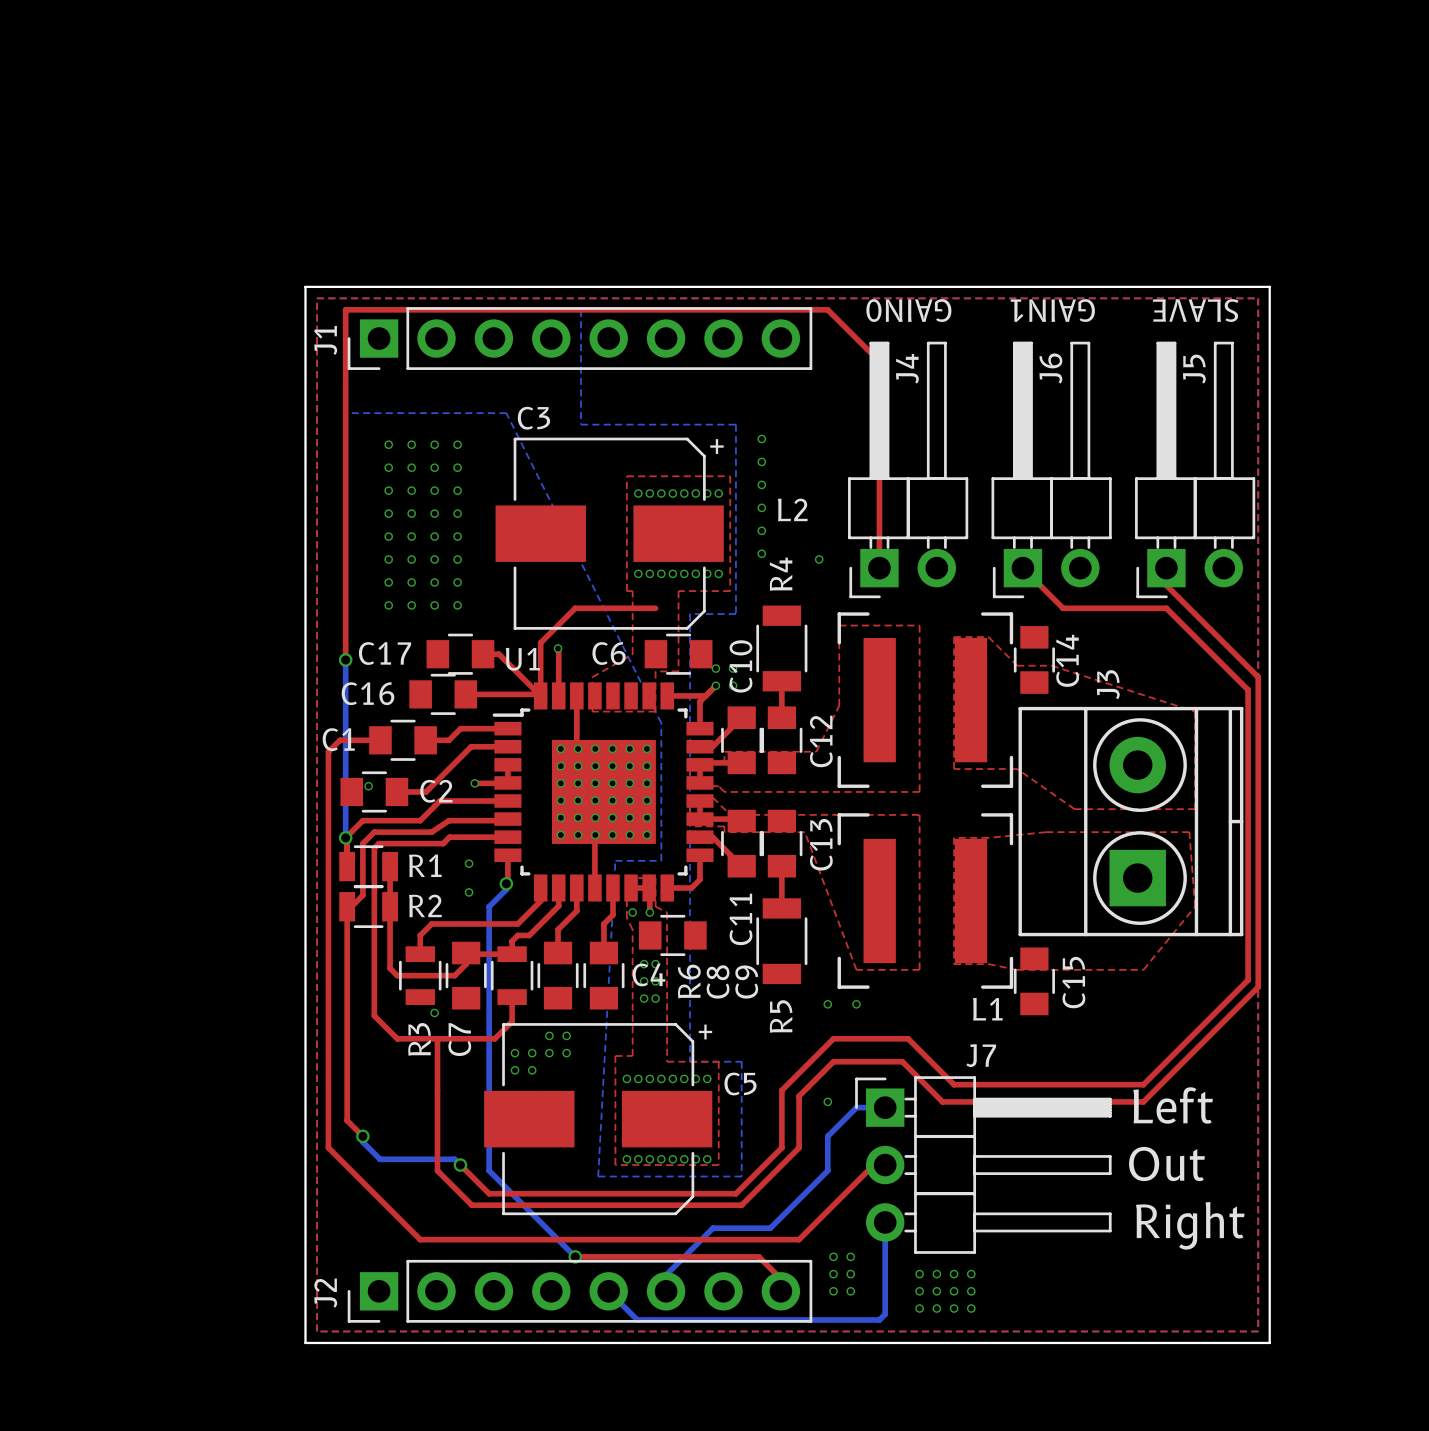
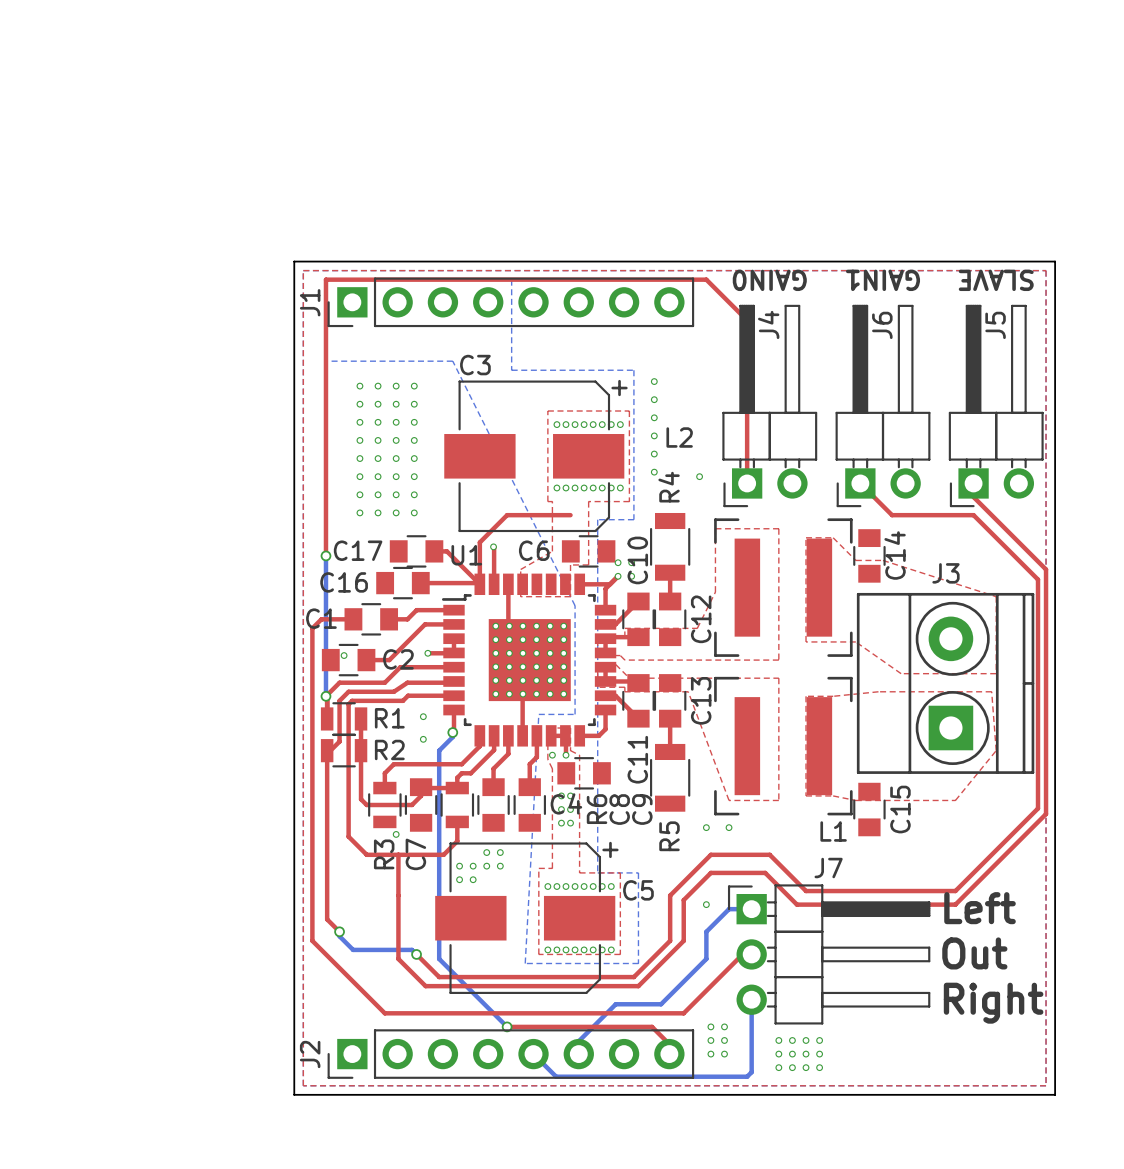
J3 name rotation: 0° (1108, 684) -> 90° clockwise (945, 573)

